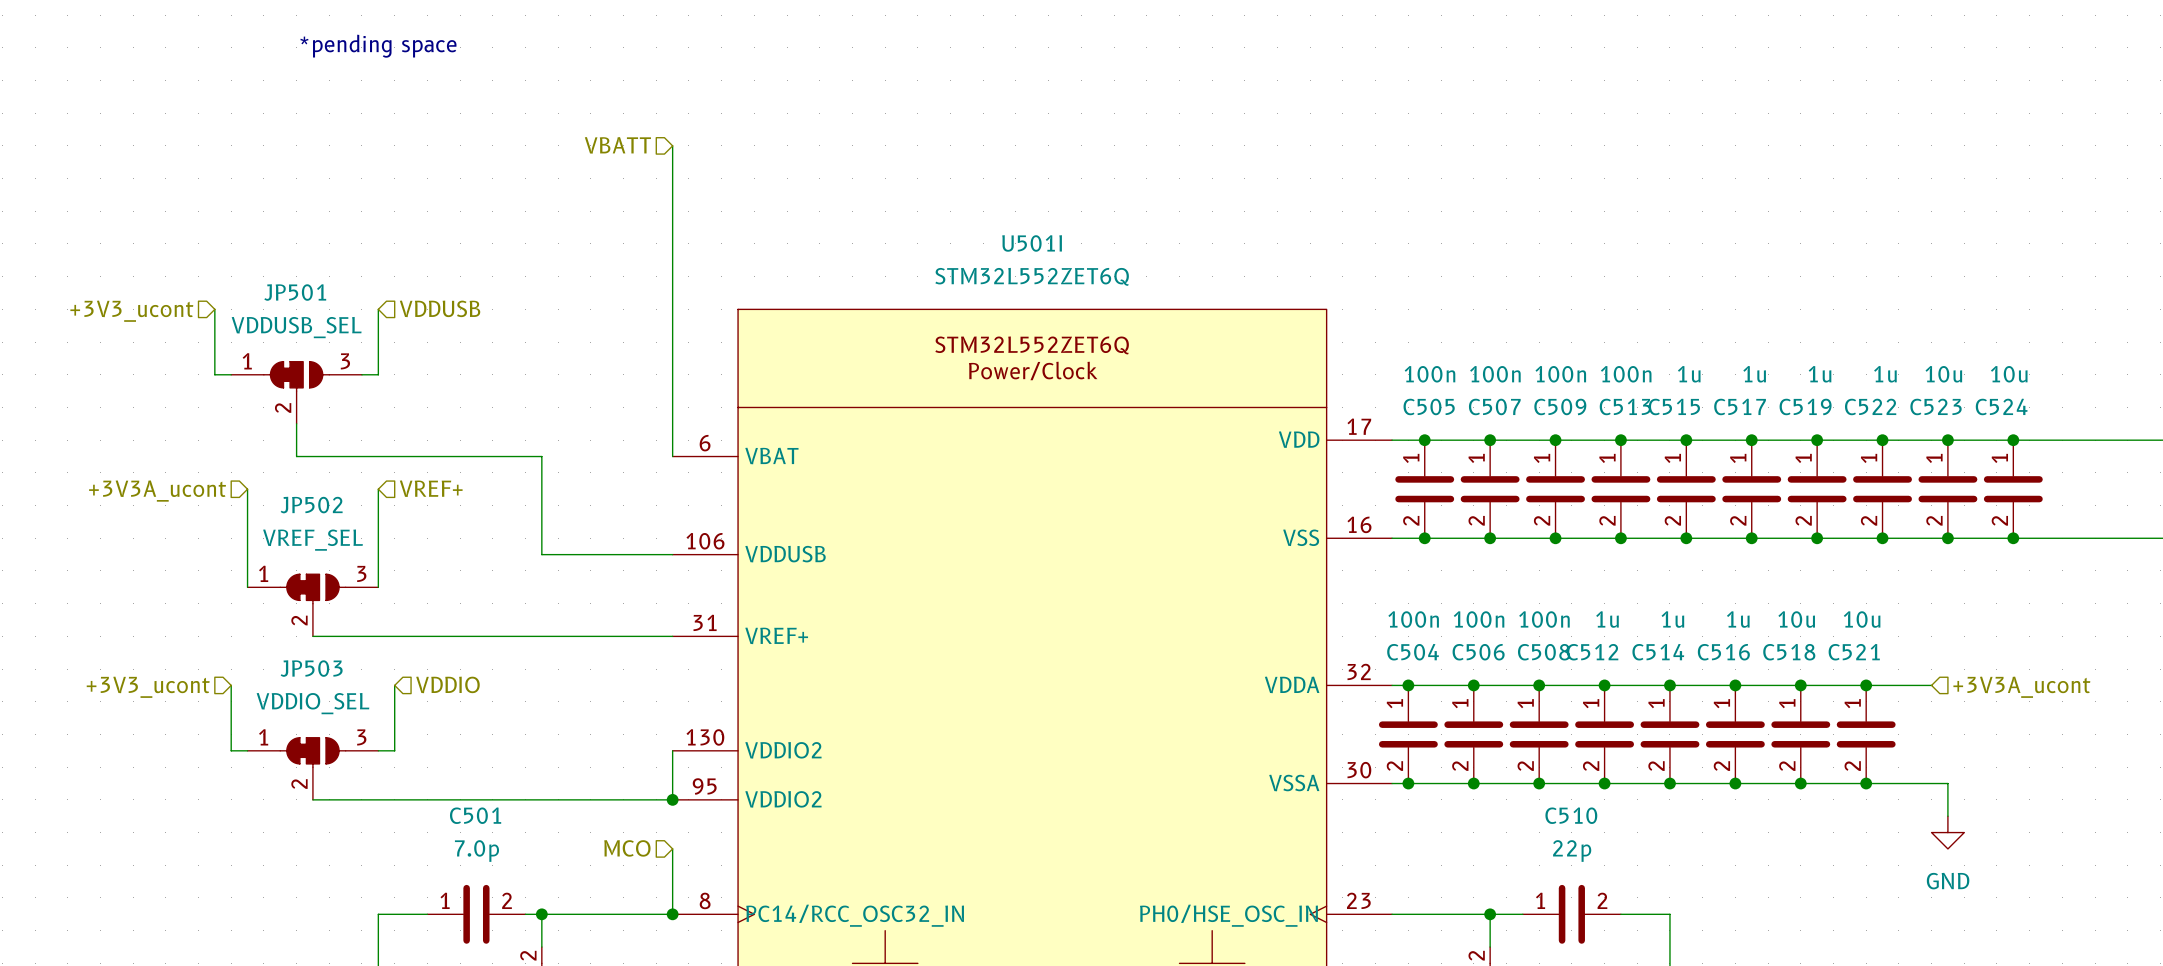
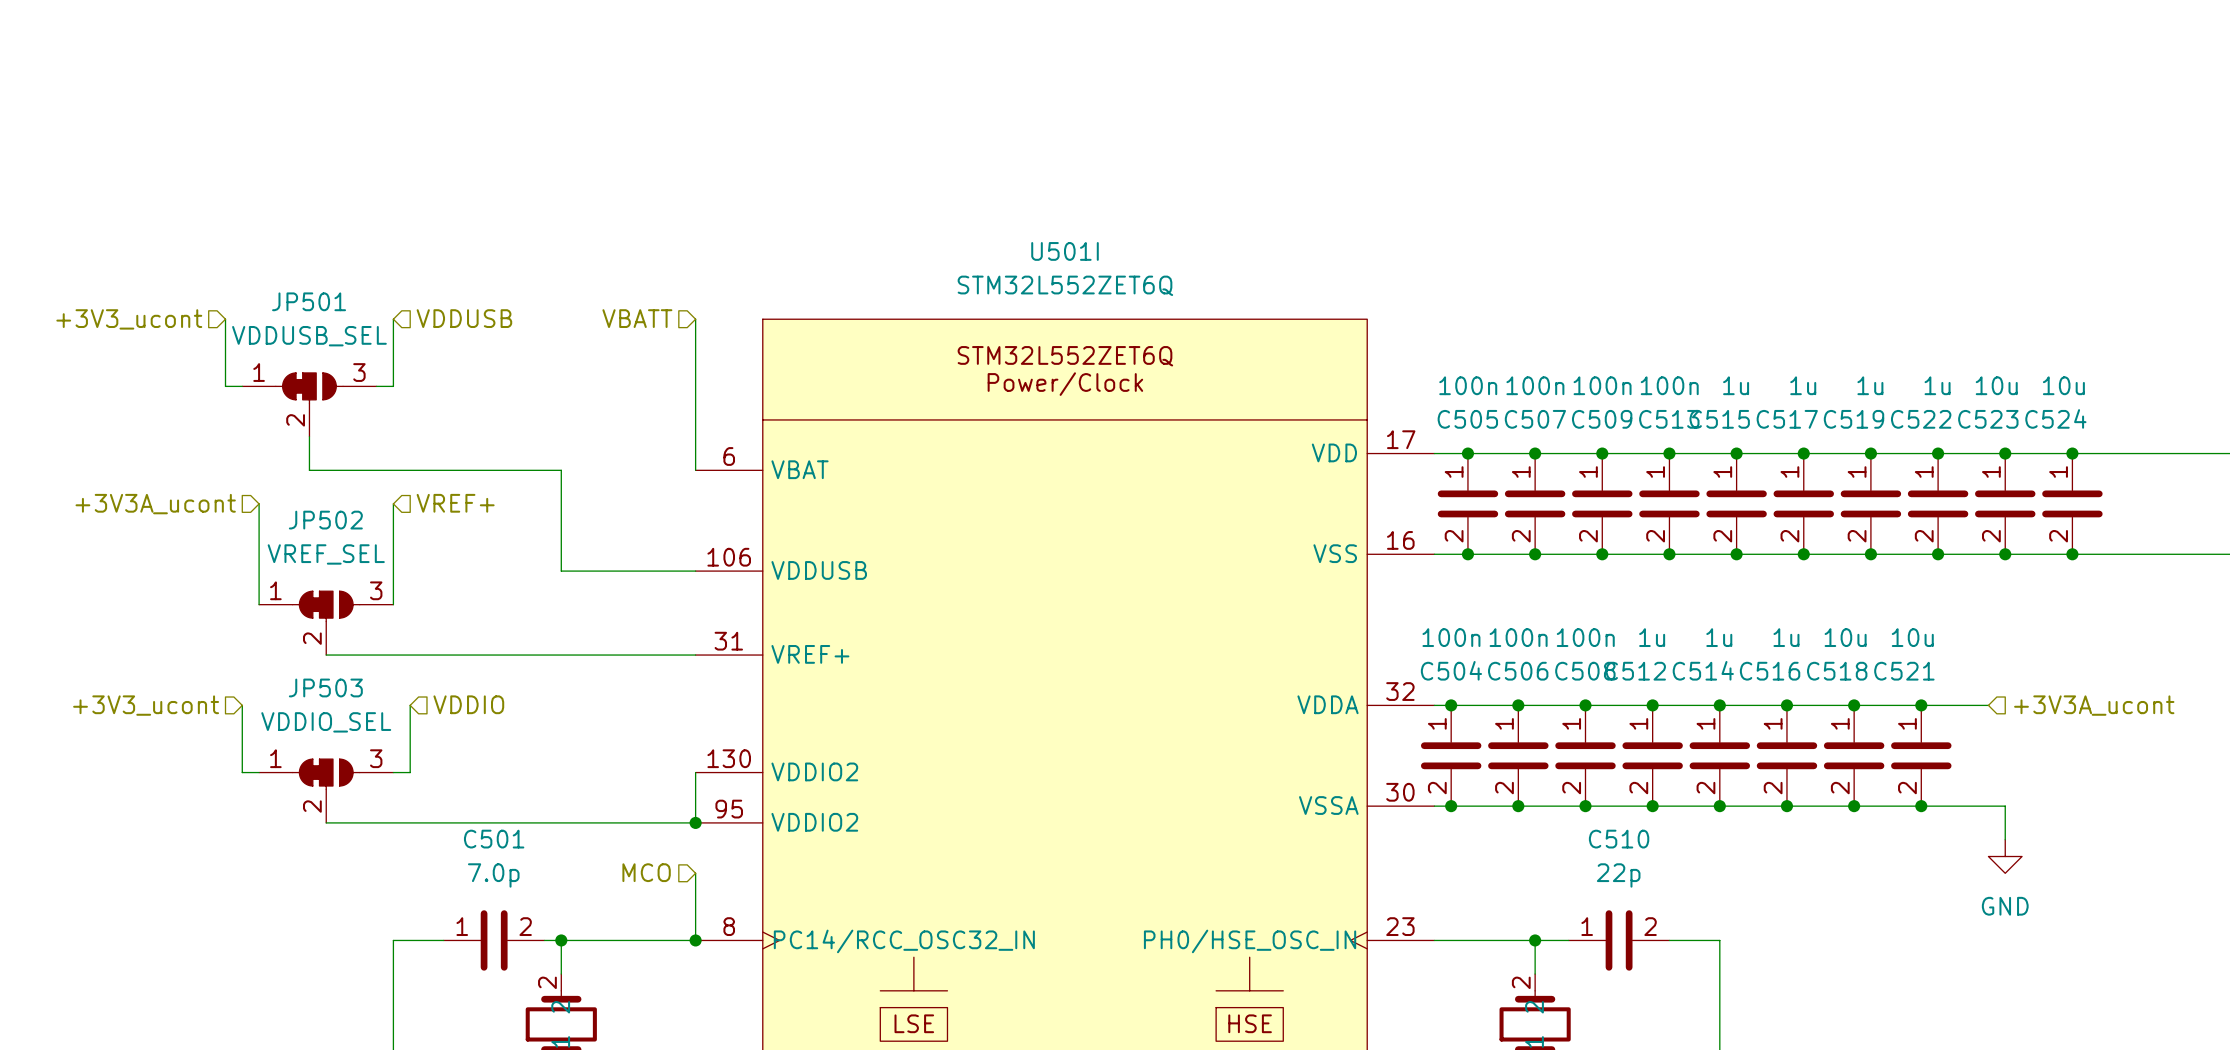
text: *pending space (378, 46) -> none
hierarchical label position: VBATT (617, 145) -> VBATT (637, 318)
wire: (672, 145) (672, 309) -> none

